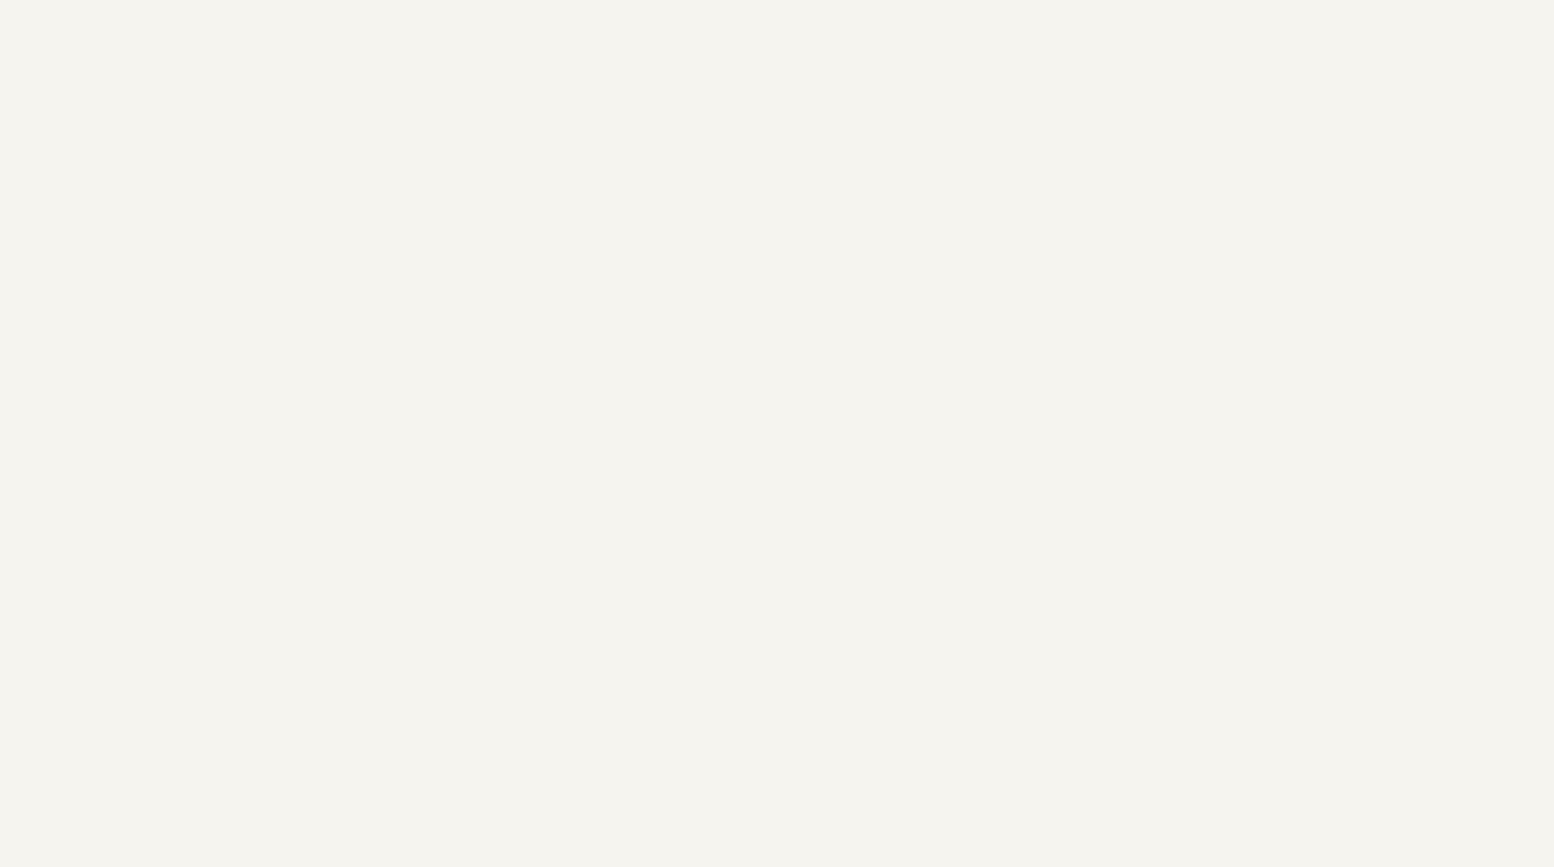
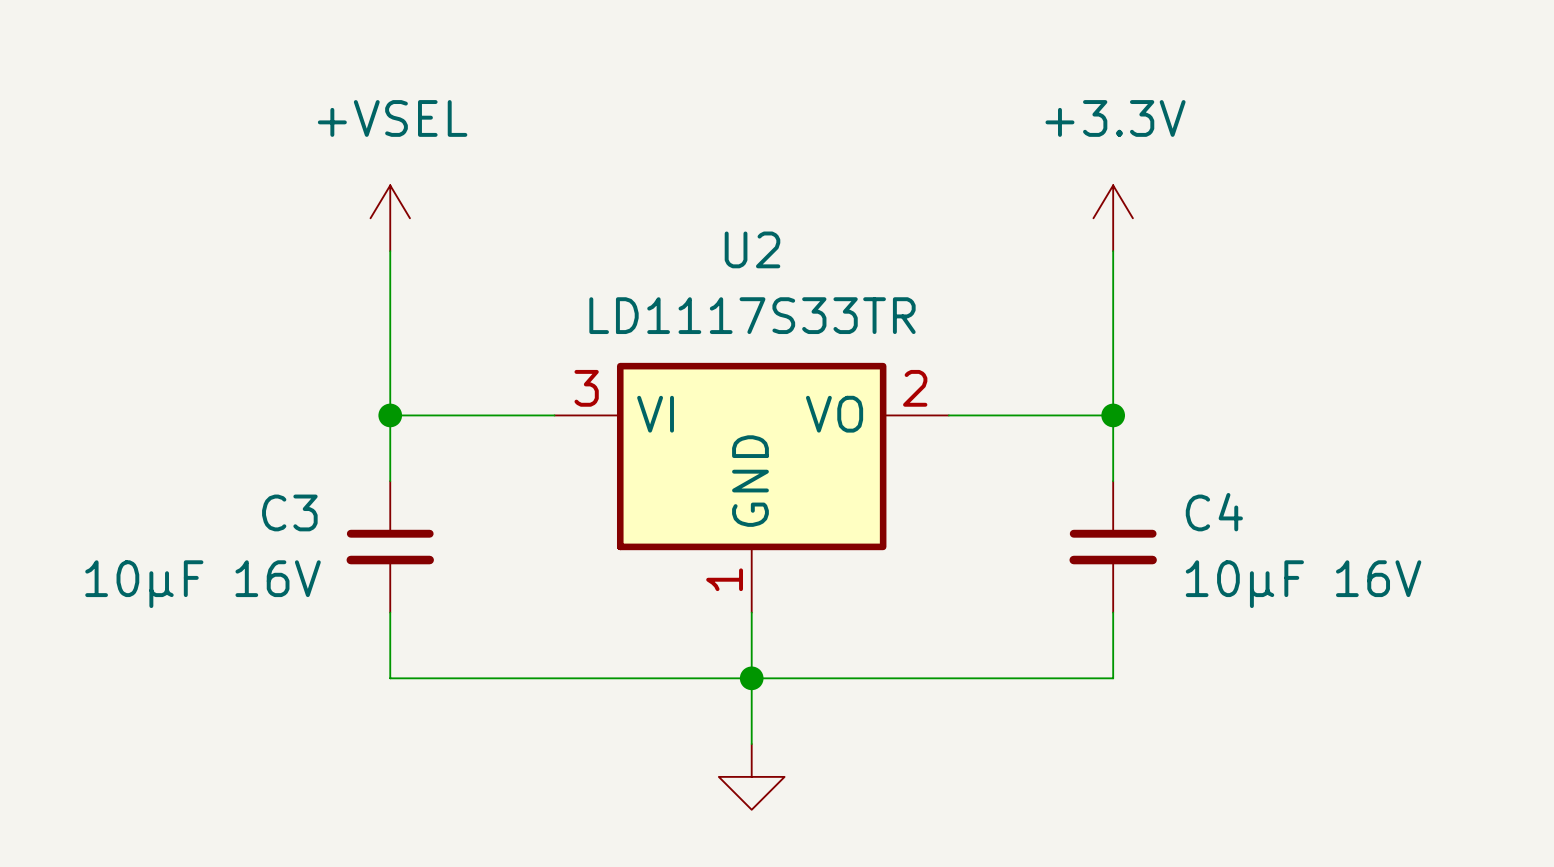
power symbol: none -> +VSEL (390, 218)
power symbol: none -> +3.3V (1113, 218)
wire: none -> (390, 251) (390, 481)
wire: none -> (1113, 251) (1113, 481)
wire: none -> (390, 415) (554, 415)
junction: none -> (390, 415)
wire: none -> (948, 415) (1113, 415)
junction: none -> (1113, 415)
U2: none -> LD1117S33TR (751, 487)
C3: none -> 10µF 16V (390, 546)
C4: none -> 10µF 16V (1113, 546)
wire: none -> (390, 612) (390, 678) (1113, 678) (1113, 612)
wire: none -> (751, 612) (751, 744)
junction: none -> (751, 678)
power symbol: none -> (751, 776)

